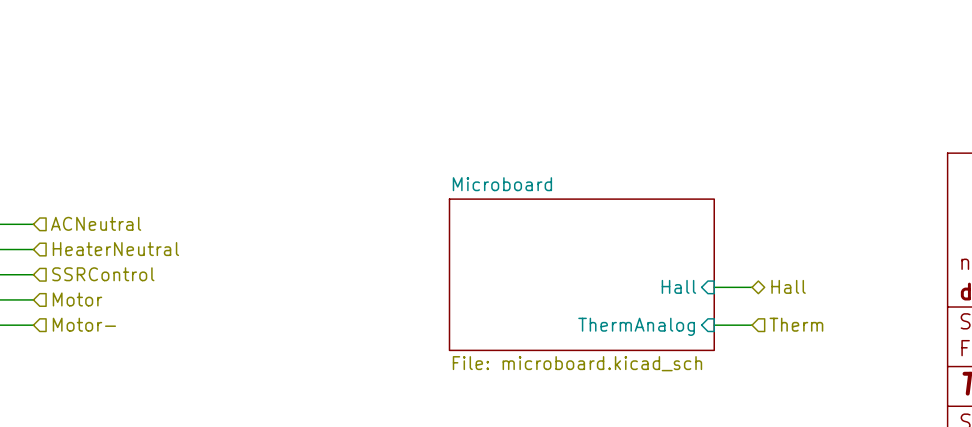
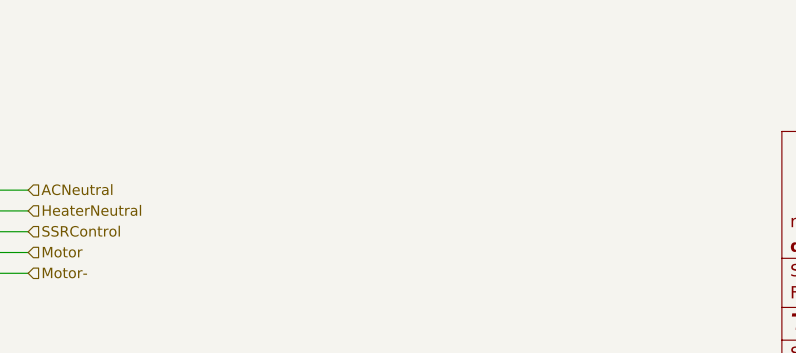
sheet Microboard: File: microboard.kicad_sch (581, 274) -> none
sheet pin: Hall (678, 286) -> none
hierarchical label: Hall (788, 286) -> none
wire: (714, 287) (752, 287) -> none
hierarchical label: Therm (796, 324) -> none
wire: (714, 325) (752, 325) -> none
sheet pin: ThermAnalog (636, 326) -> none

